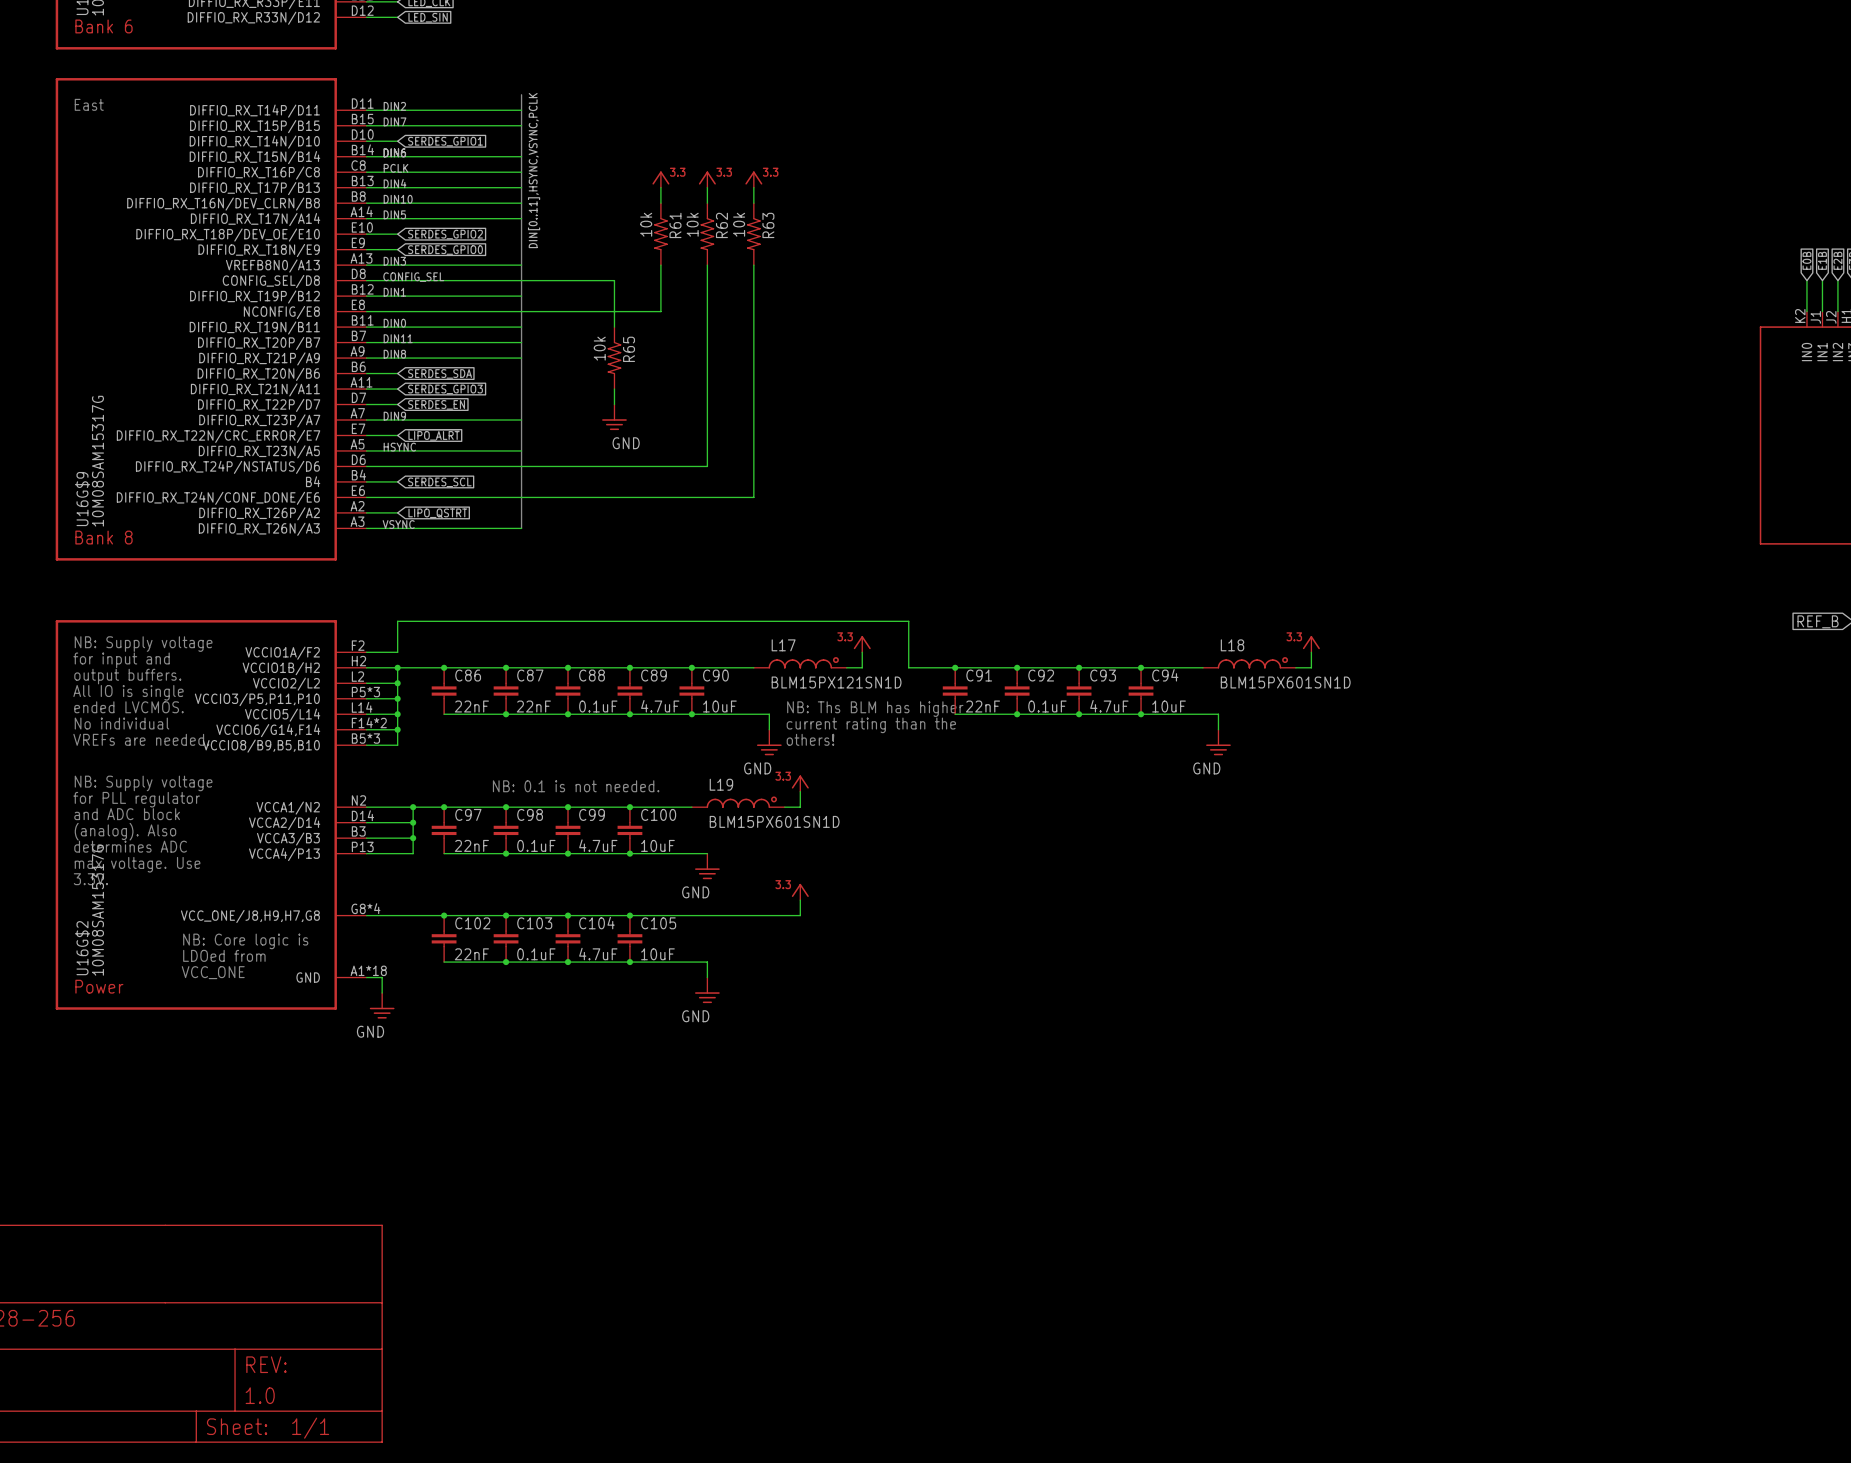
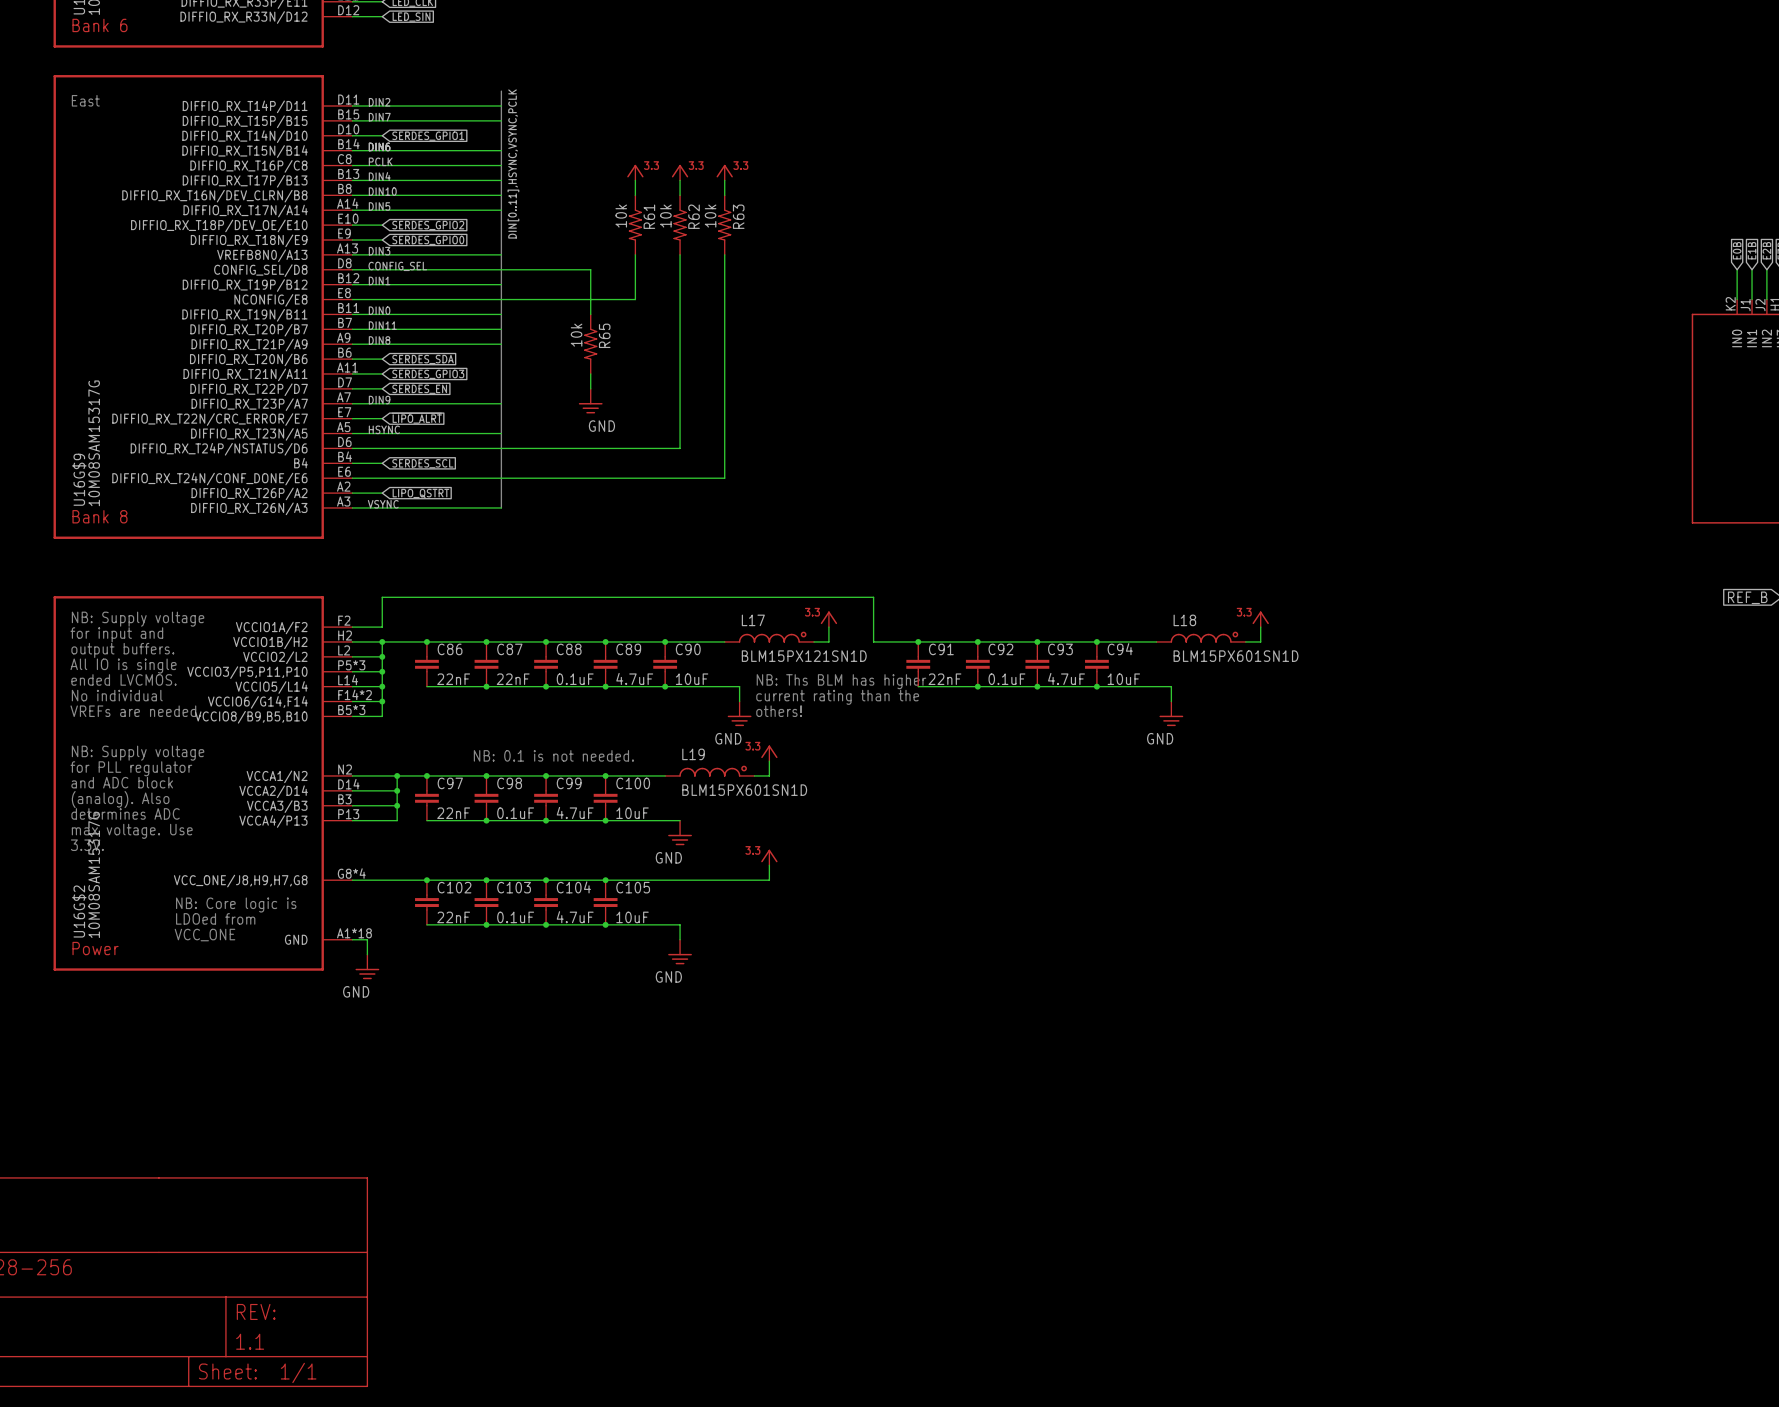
part text: 1.0 (260, 1395) -> 1.1 (250, 1341)

